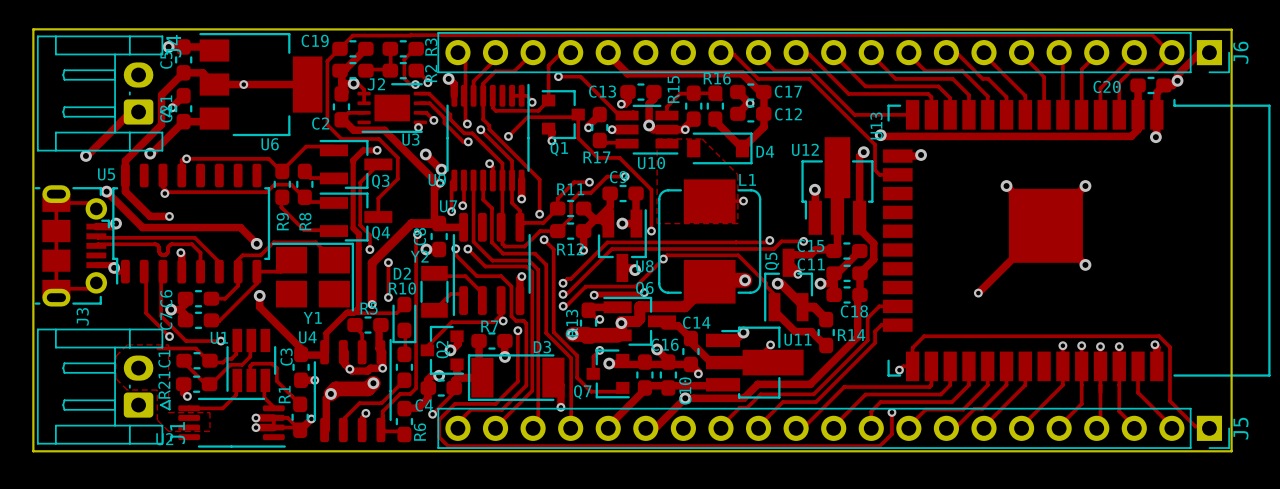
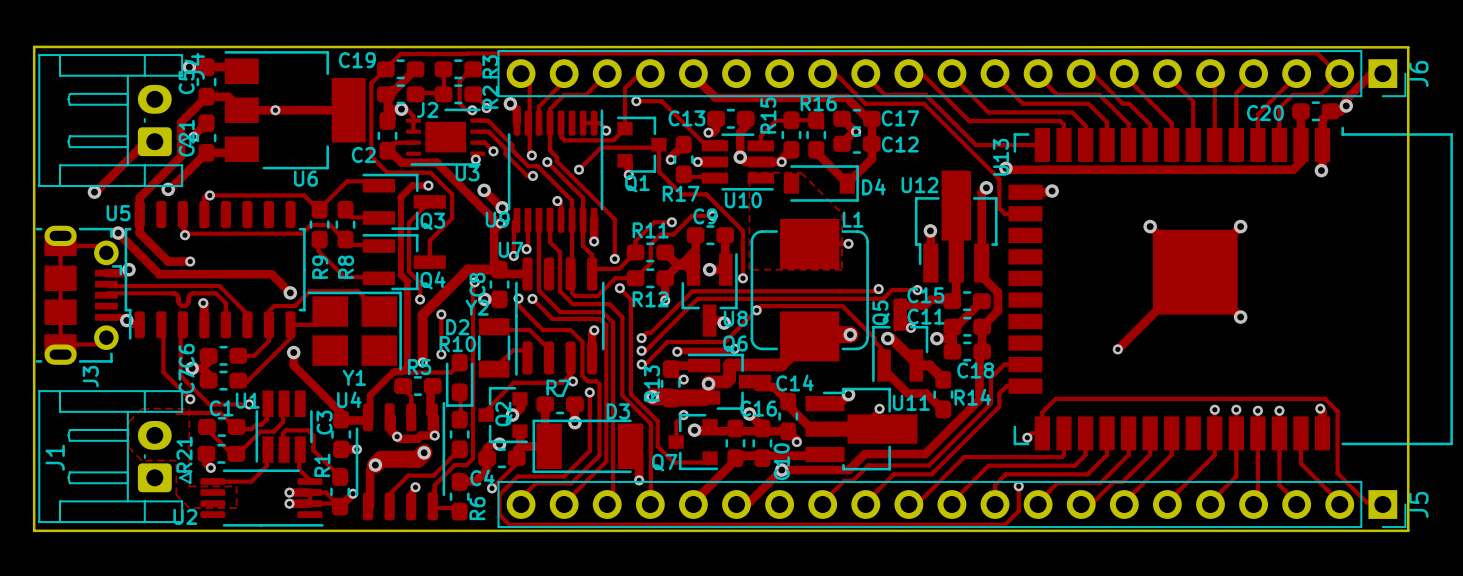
C1 name rotation: 0° (164, 358) -> 90° clockwise (221, 408)
C1 name position: C1 (164, 358) -> C1 (221, 408)
J1 name position: J1 (177, 433) -> J1 (55, 457)

